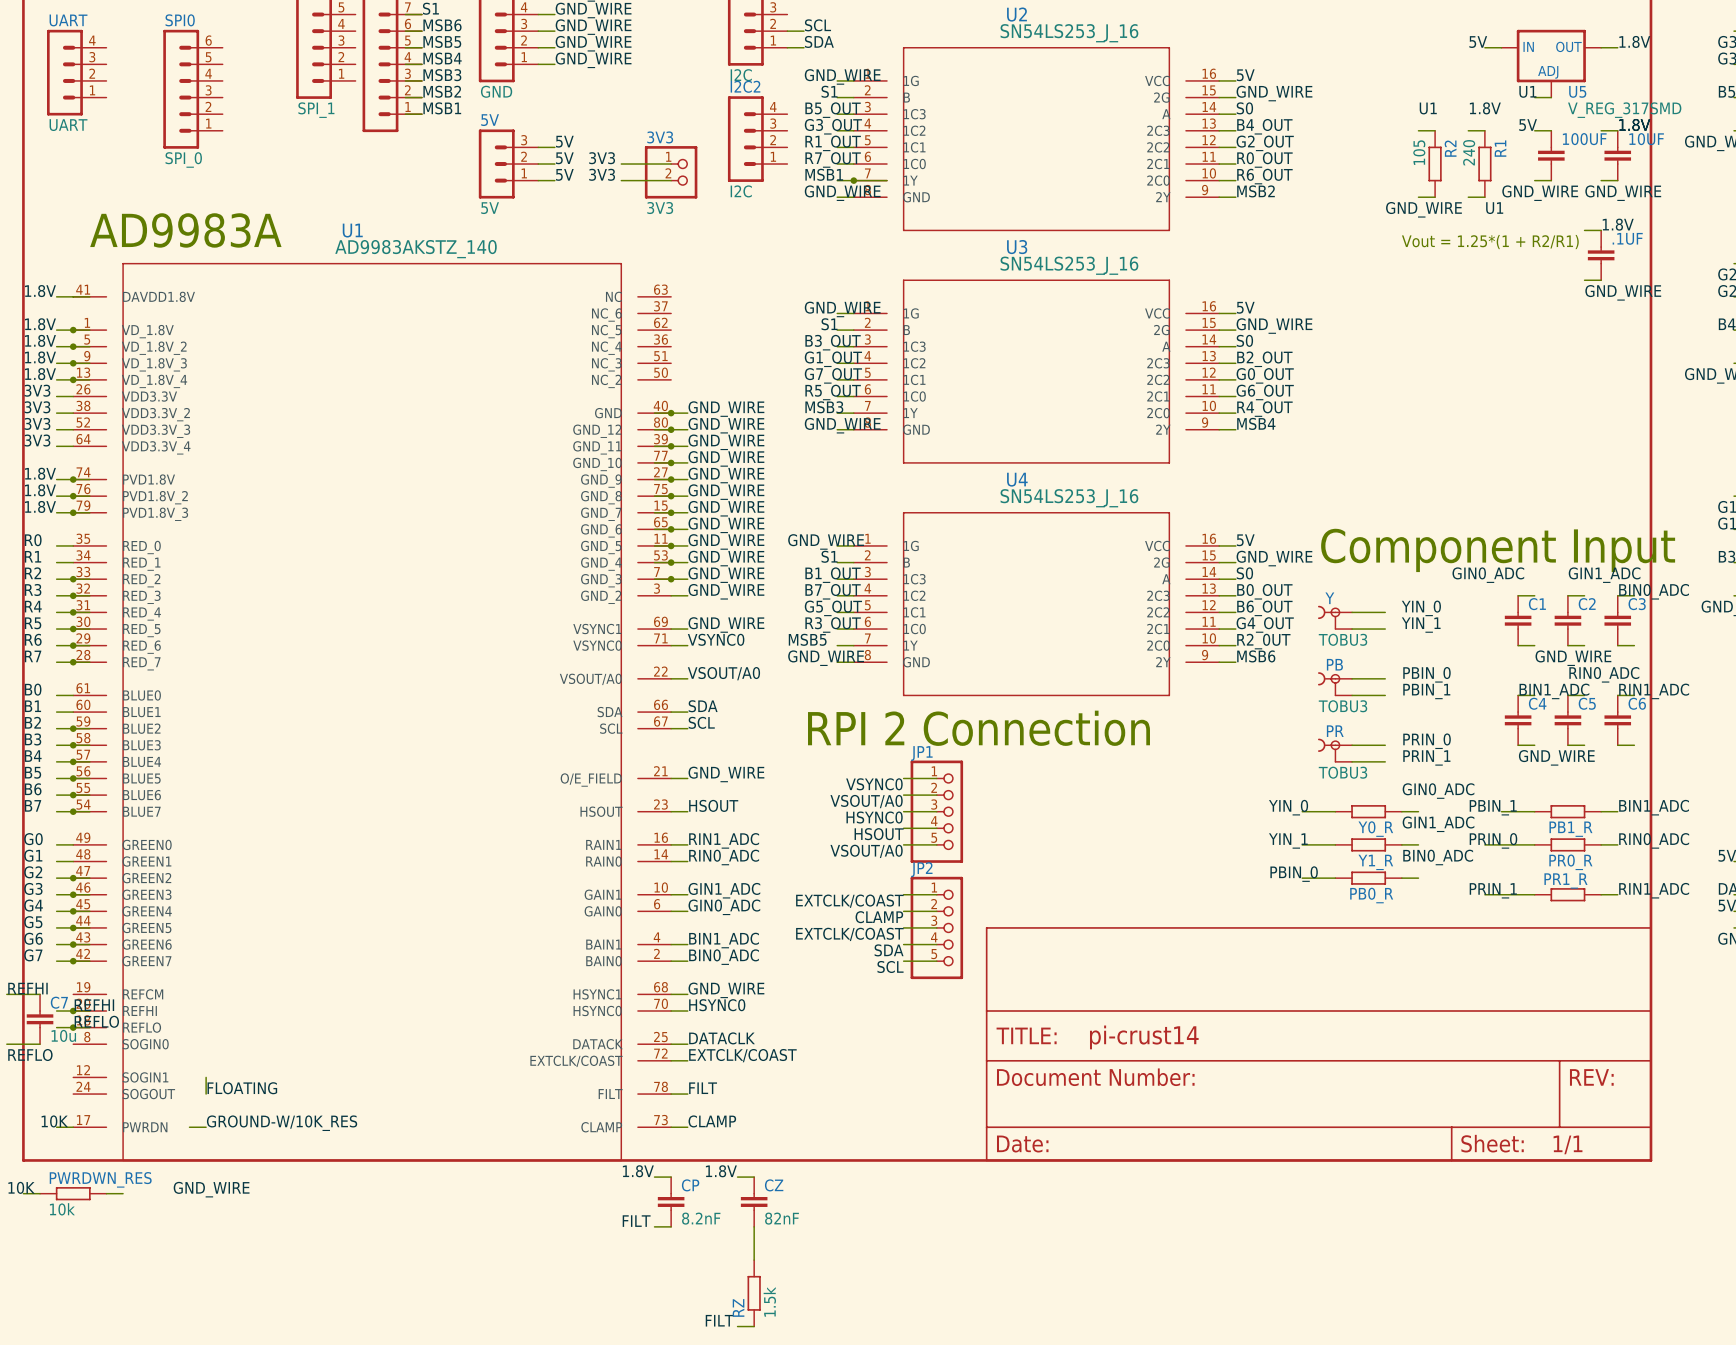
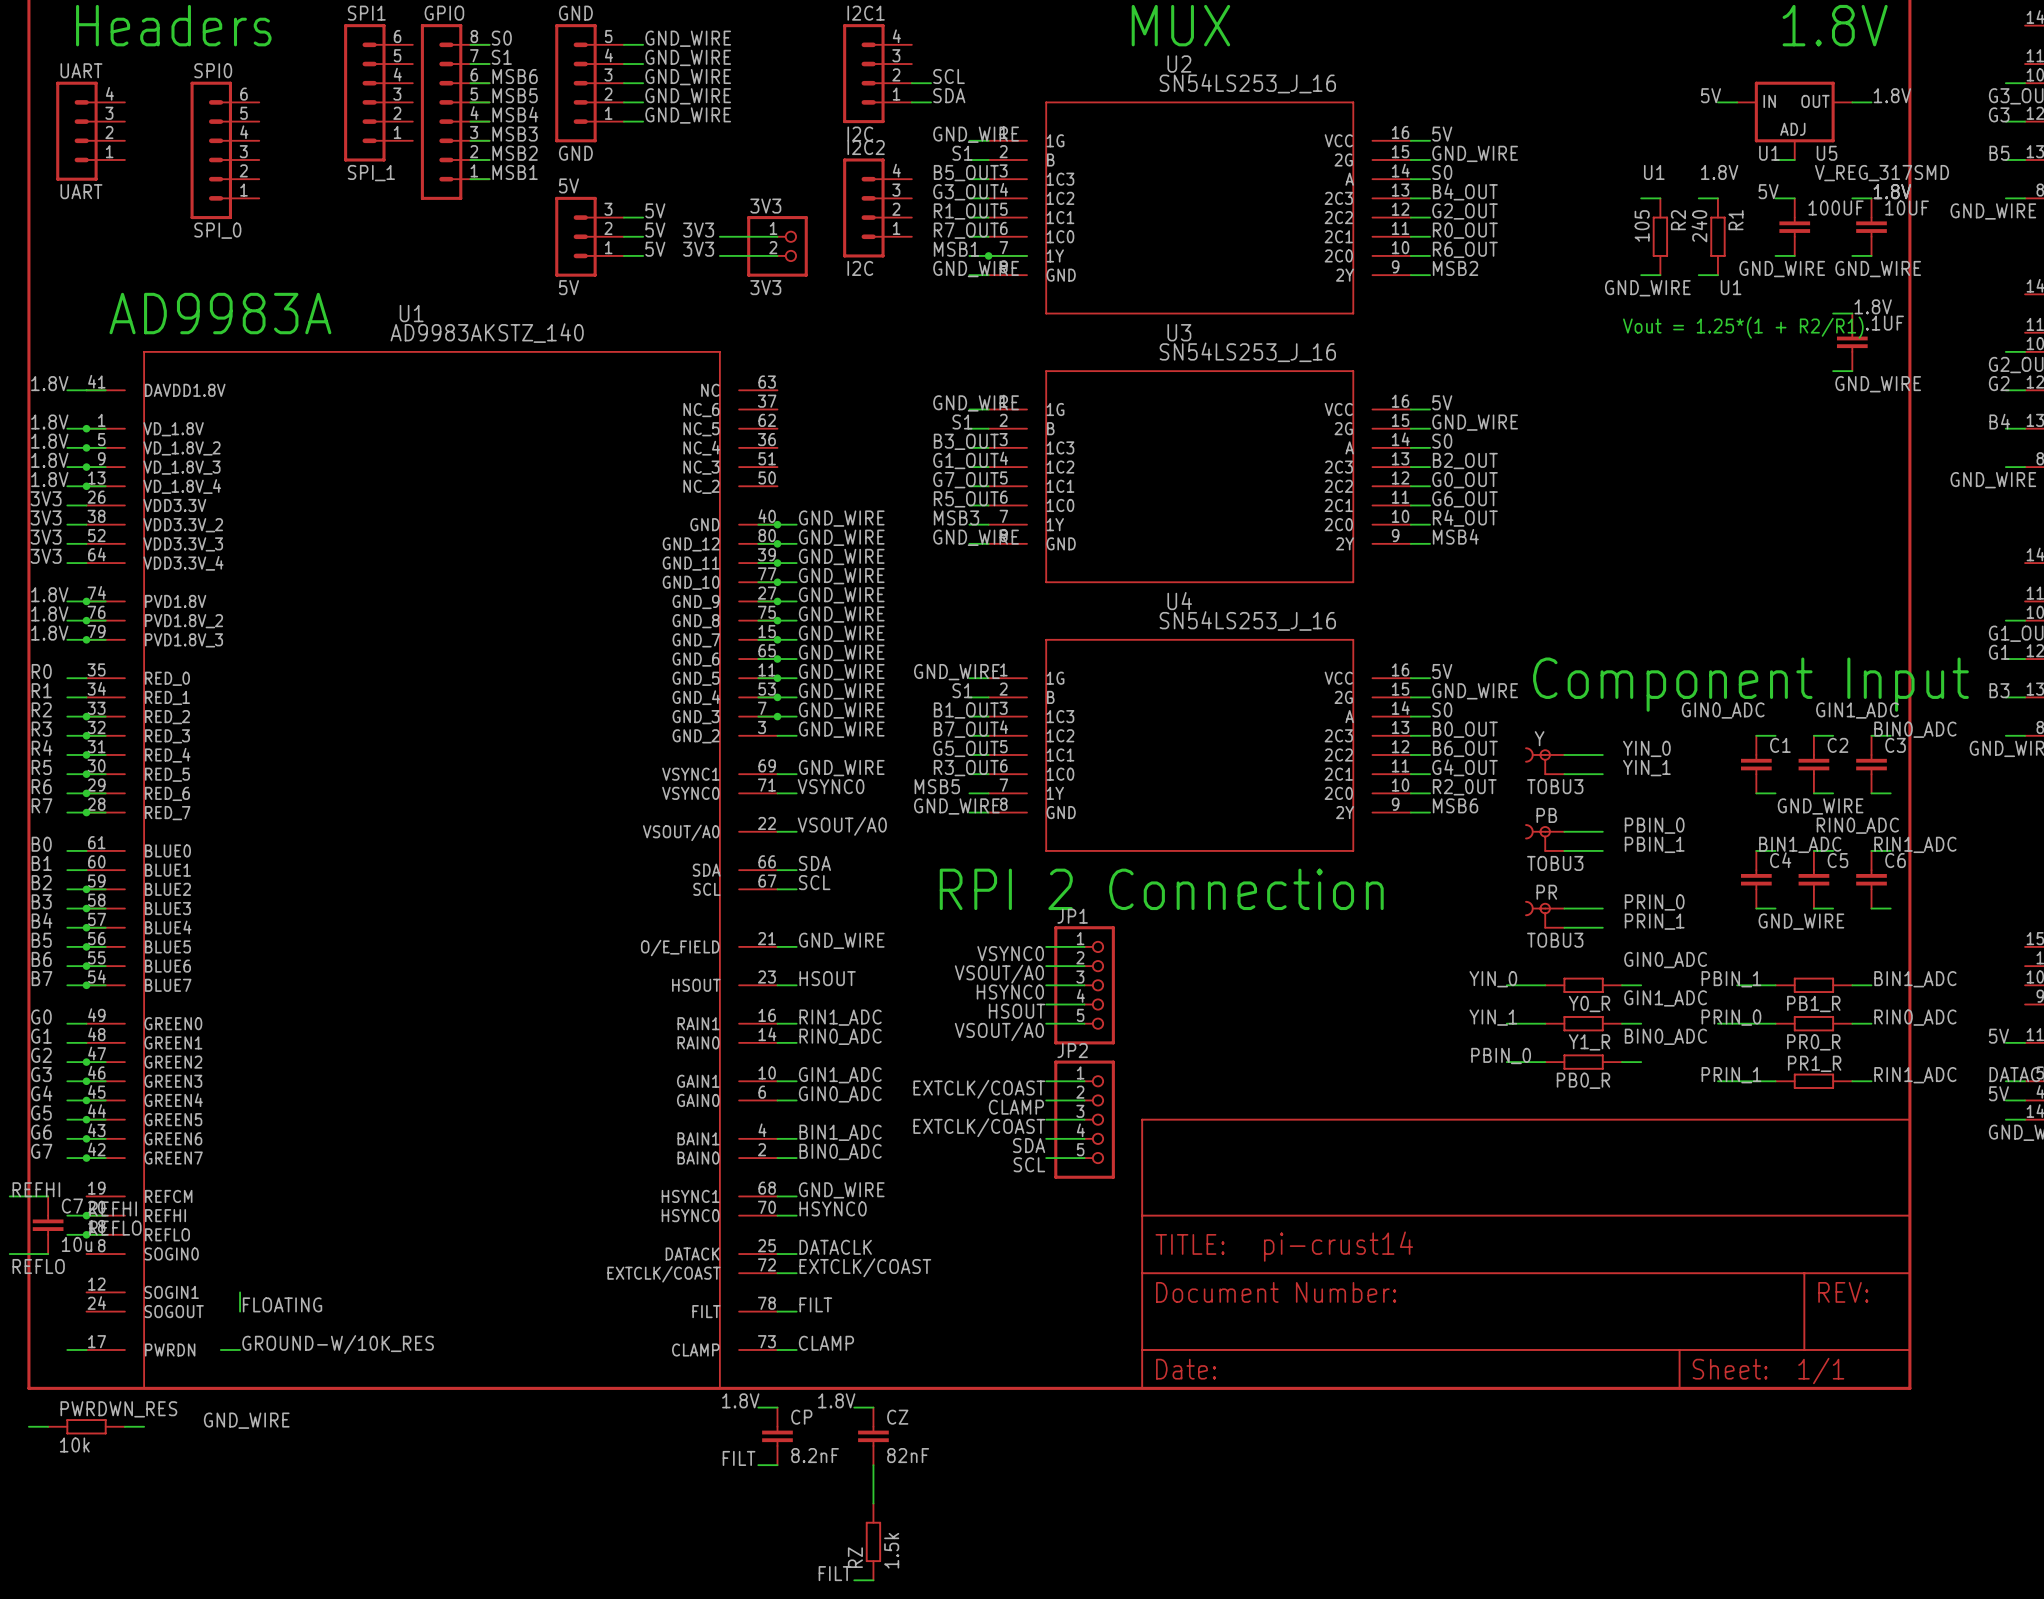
label: 10K (54, 1121) -> none
label: 10K (21, 1187) -> none

